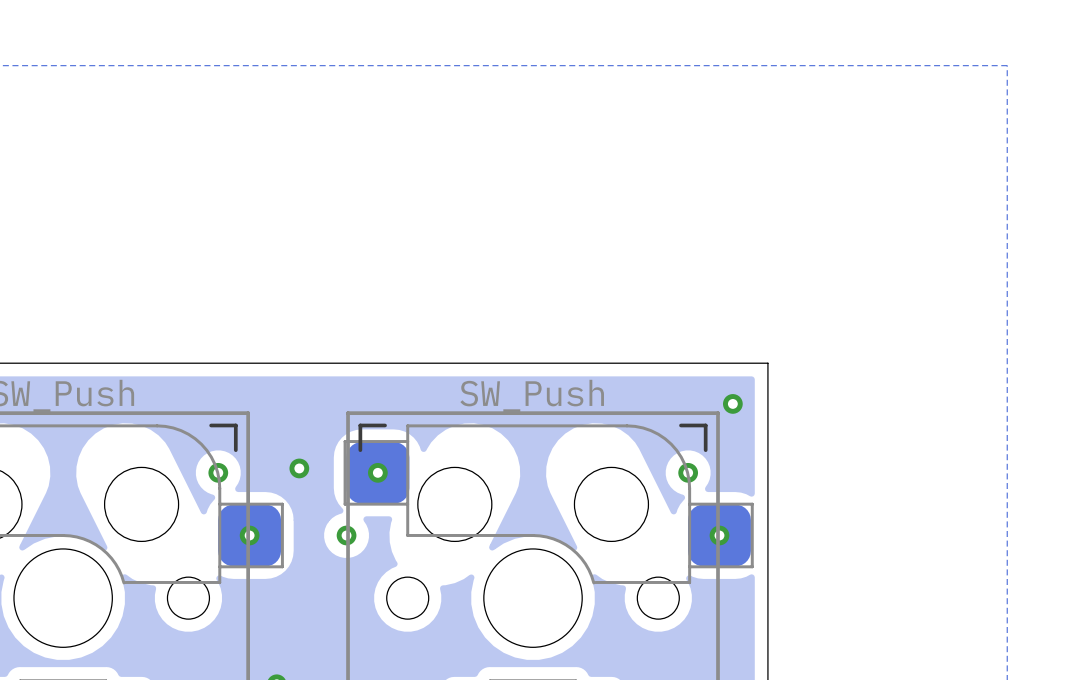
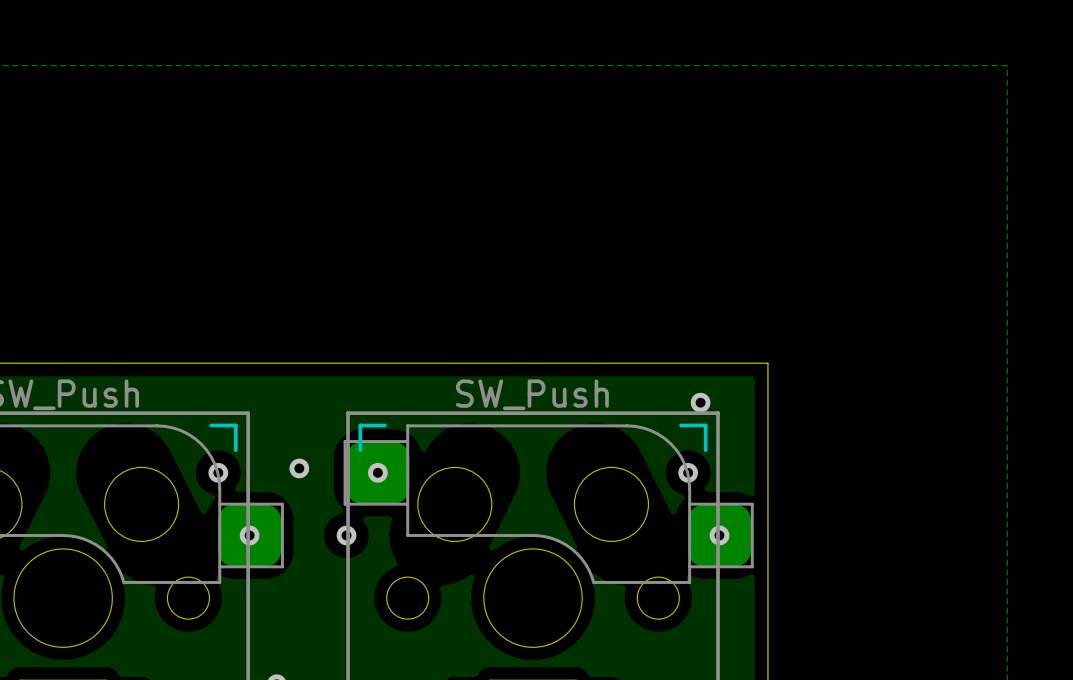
via position: (732, 403) -> (700, 402)

